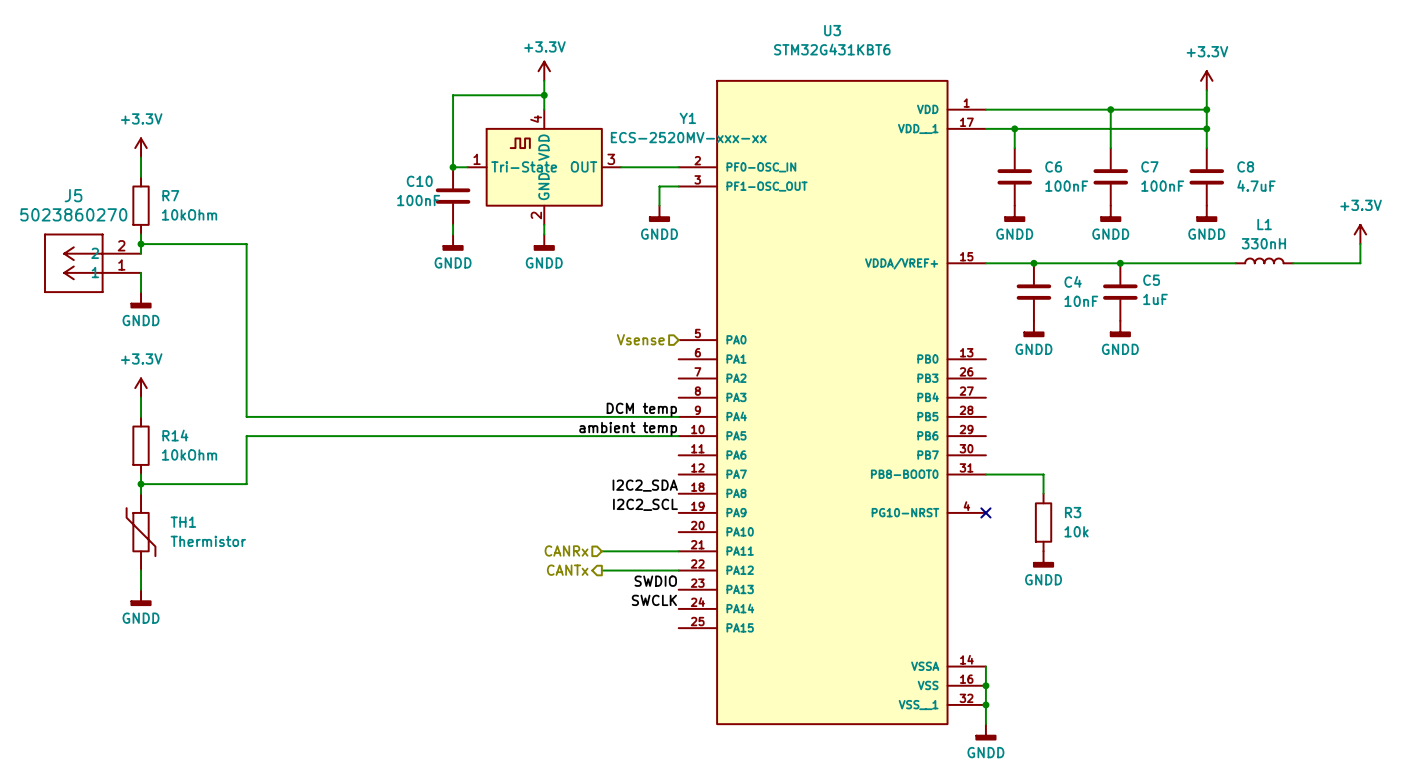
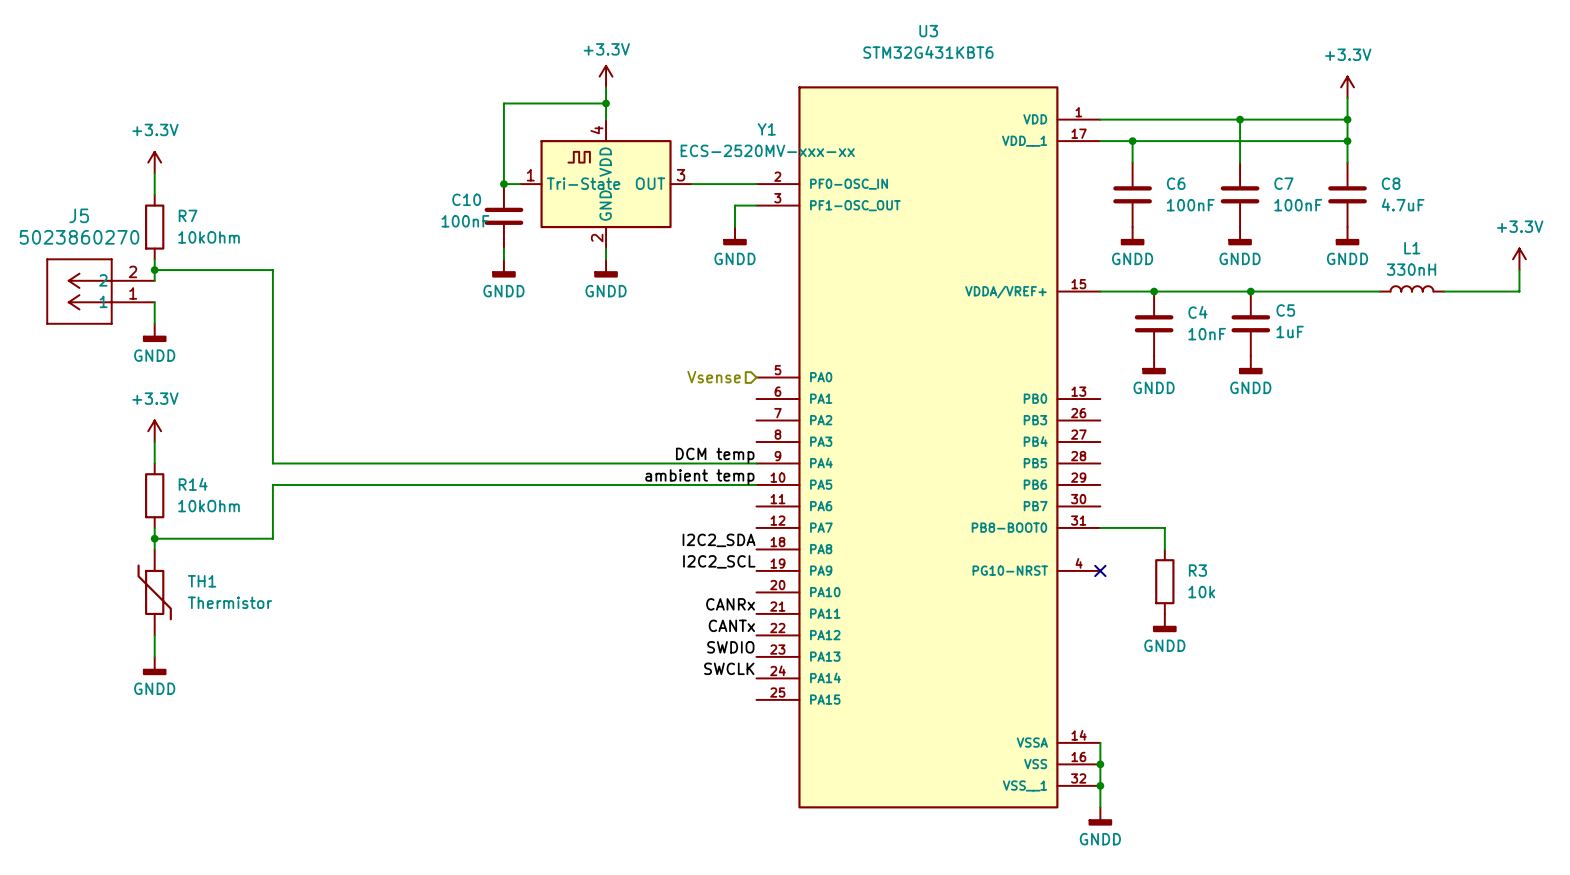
label: none -> CANRx (730, 604)
hierarchical label: CANRx (566, 550) -> none
wire: (601, 551) (678, 551) -> none
label: none -> CANTx (731, 625)
hierarchical label: CANTx (567, 570) -> none
wire: (601, 570) (678, 570) -> none

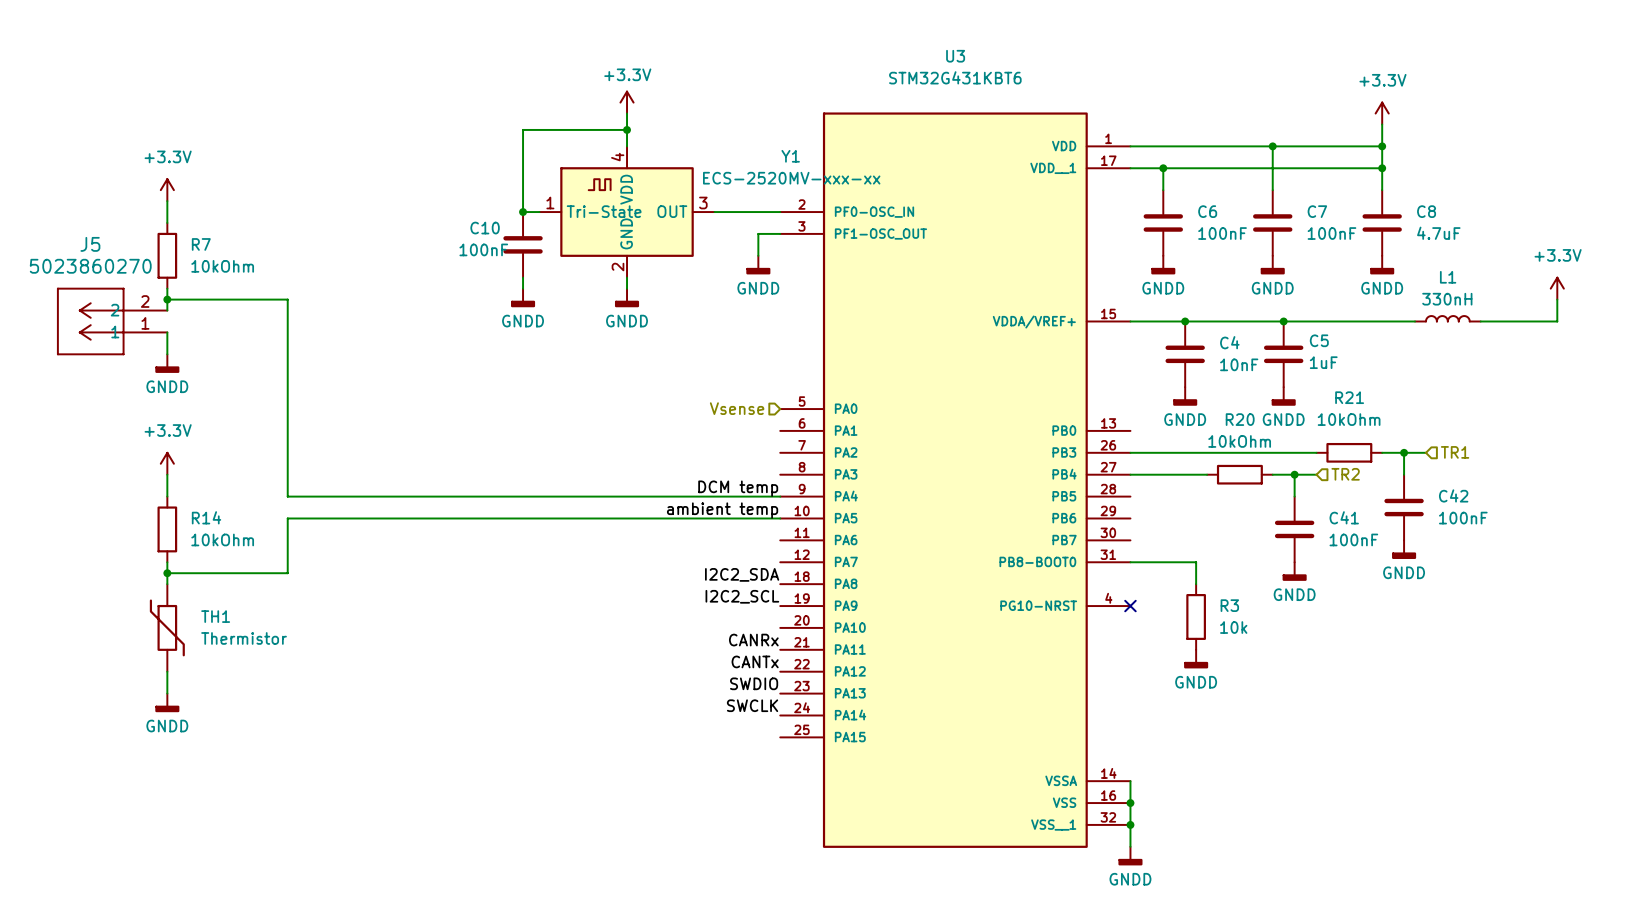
wire: none -> (1130, 452) (1316, 452)
R21: none -> 10kOhm (1349, 452)
wire: none -> (1382, 452) (1425, 452)
wire: none -> (1404, 452) (1404, 474)
junction: none -> (1404, 452)
hierarchical label: none -> TR1 (1455, 452)
hierarchical label: none -> TR2 (1345, 474)
wire: none -> (1130, 474) (1207, 474)
R20: none -> 10kOhm (1239, 474)
wire: none -> (1272, 474) (1316, 474)
wire: none -> (1294, 474) (1294, 496)
junction: none -> (1294, 474)
C42: none -> 100nF (1404, 507)
C41: none -> 100nF (1294, 529)
power symbol: none -> GNDD (1404, 549)
power symbol: none -> GNDD (1294, 571)

